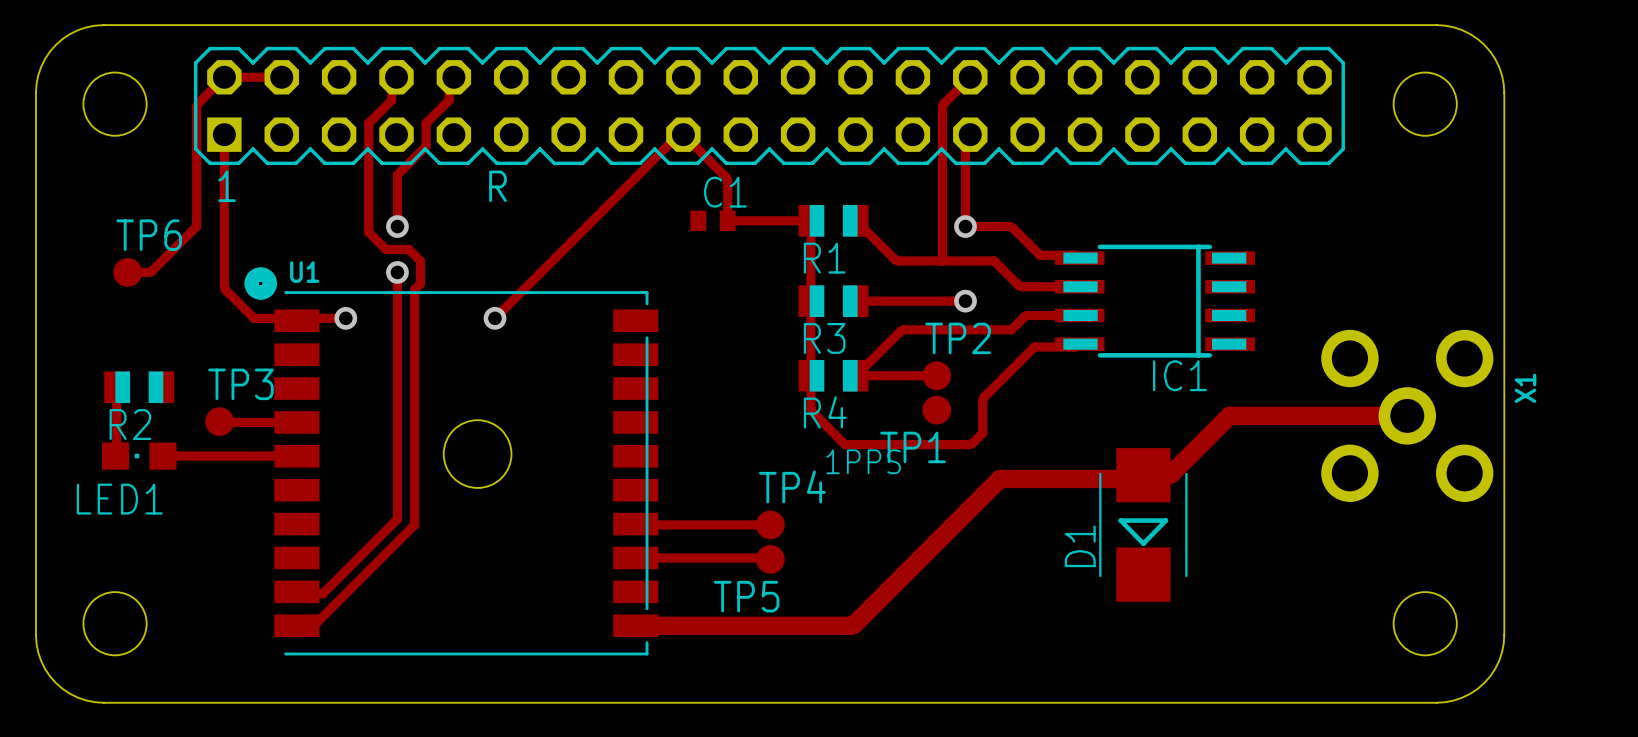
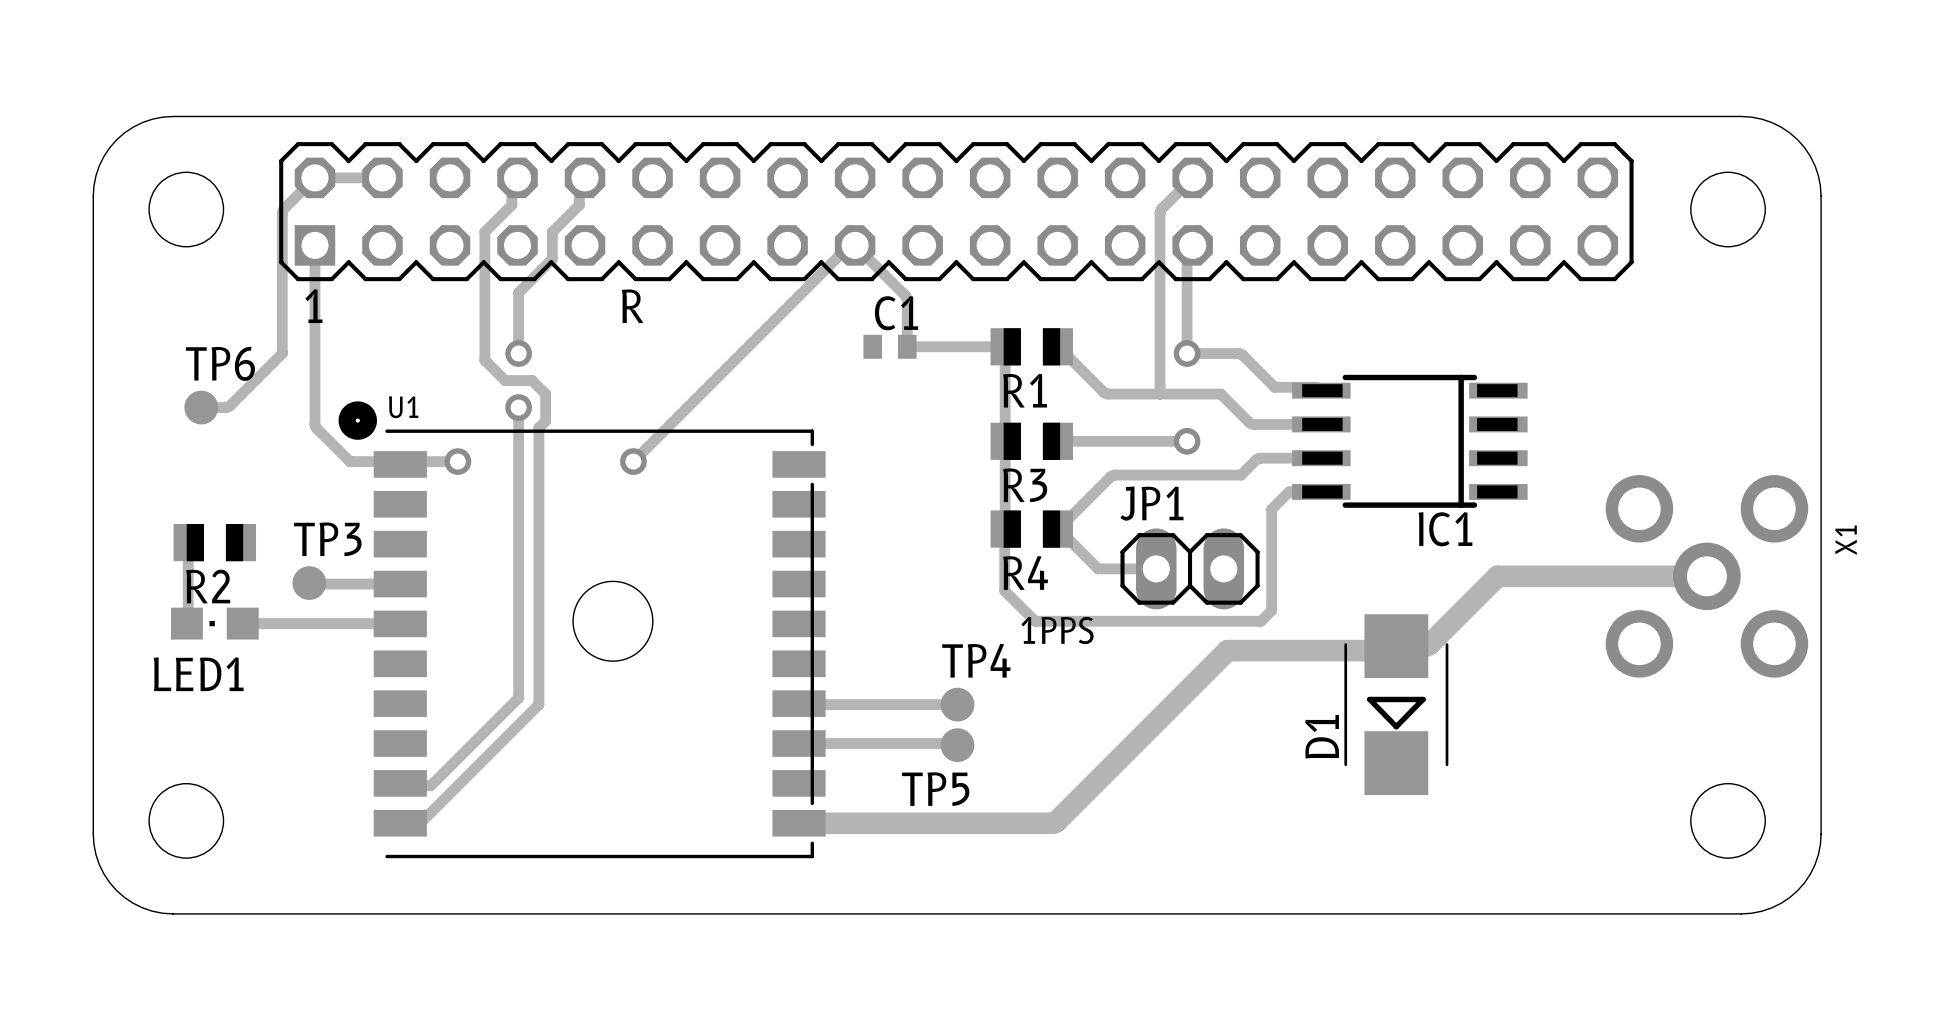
track: (1079, 344) (1074, 347) (1034, 347) (983, 398) (982, 433) (969, 444) (845, 444) (811, 411) (810, 375) -> (1321, 491) (1289, 491) (1271, 509) (1271, 610) (1261, 621) (1035, 621) (1004, 590) (1005, 529)
track: (856, 375) (936, 375) -> (1058, 529) (1098, 568) (1156, 568)
TP2: (936, 375) -> none
JP1: none -> (1190, 568)
TP1: (936, 410) -> none

